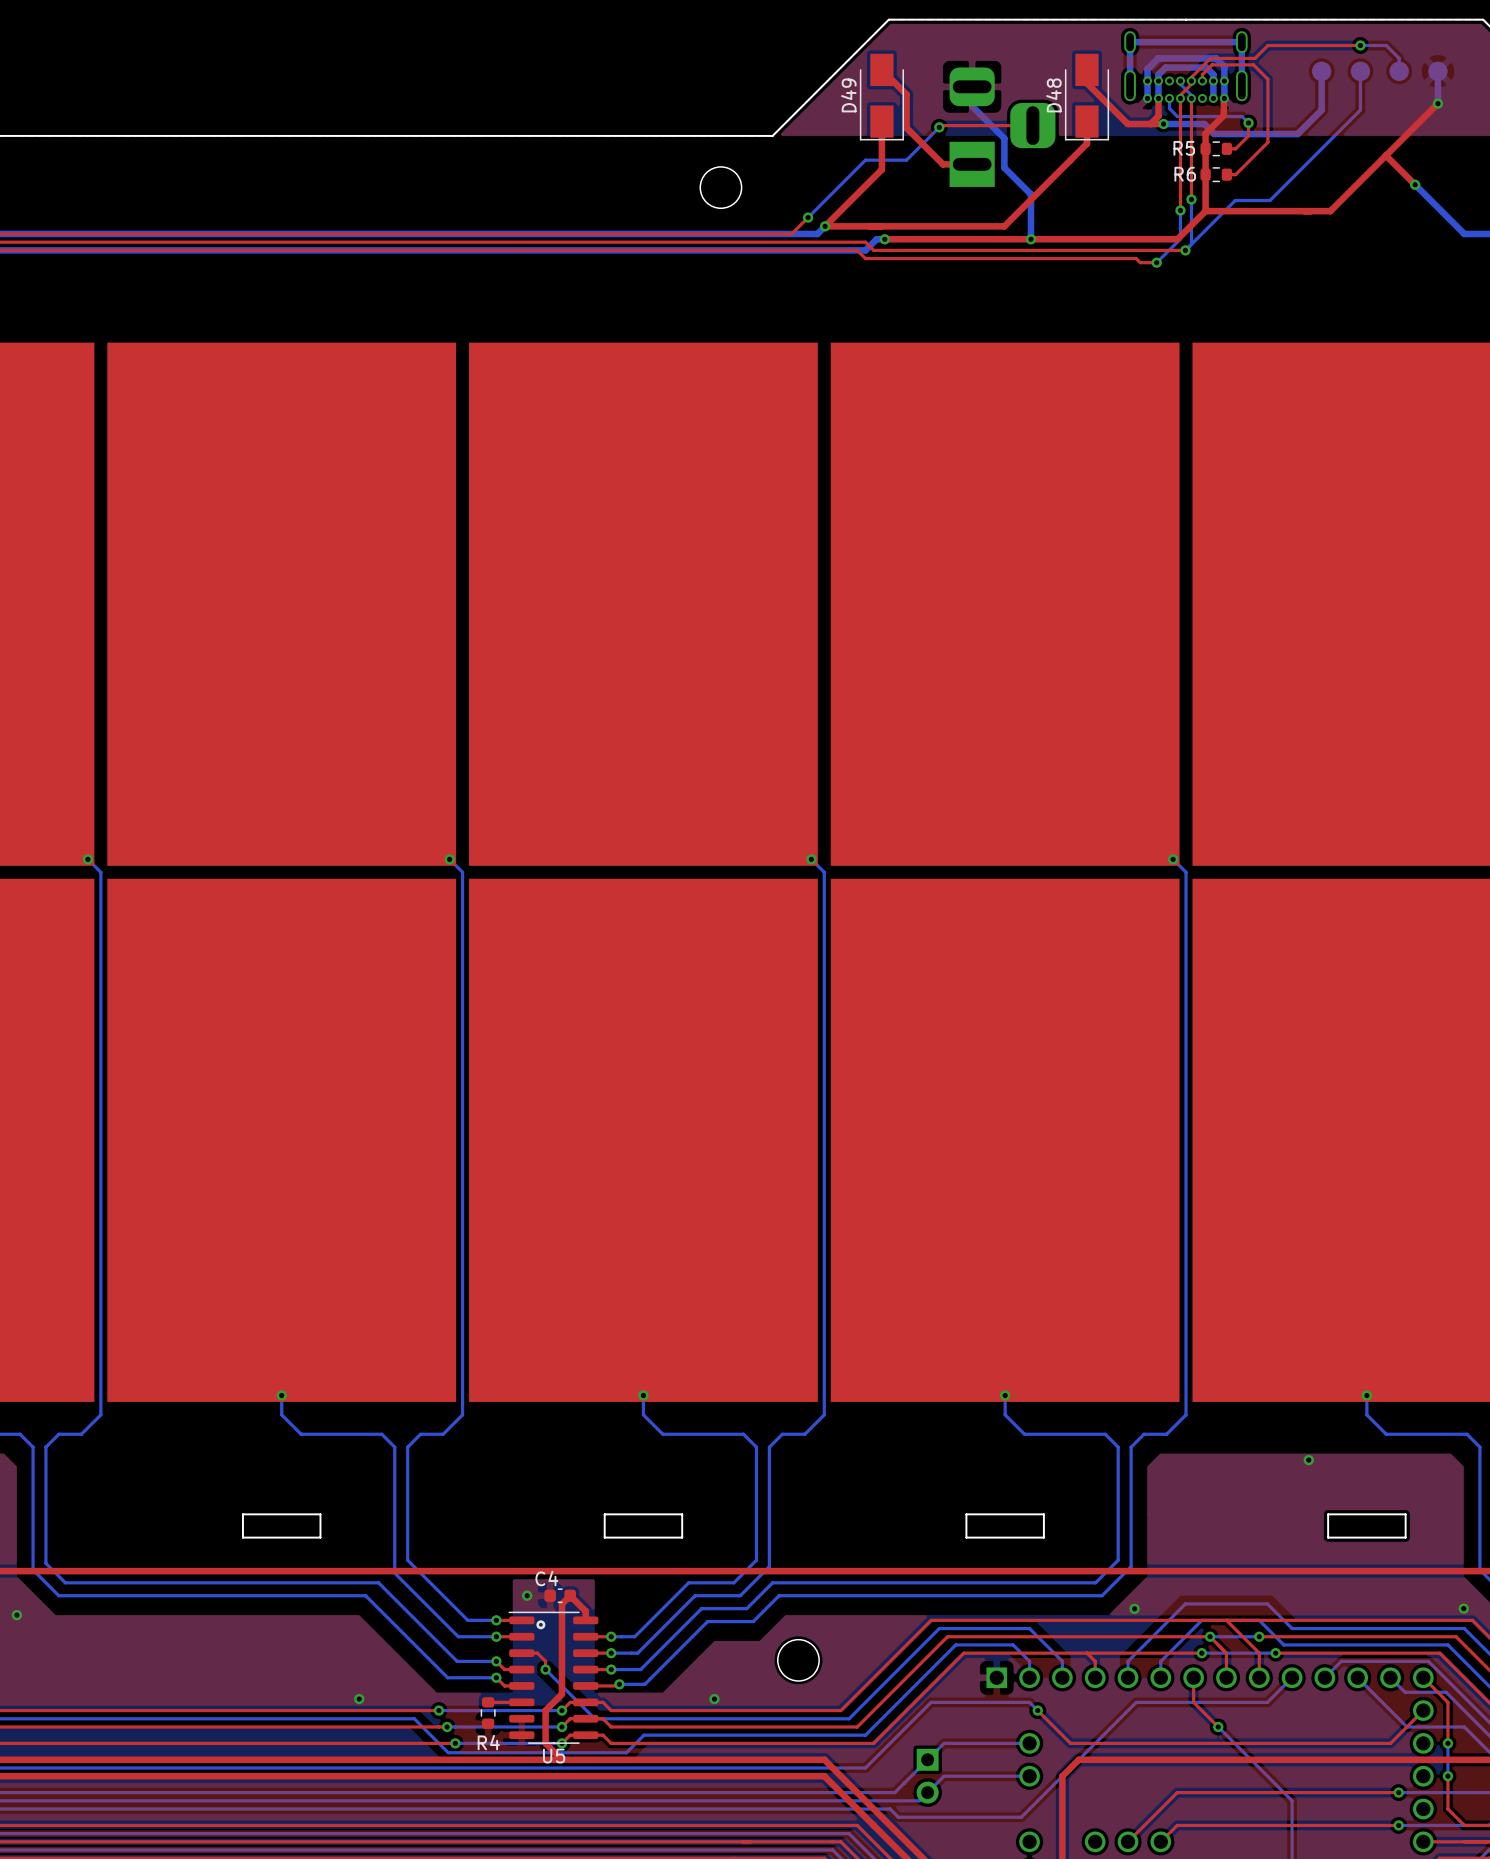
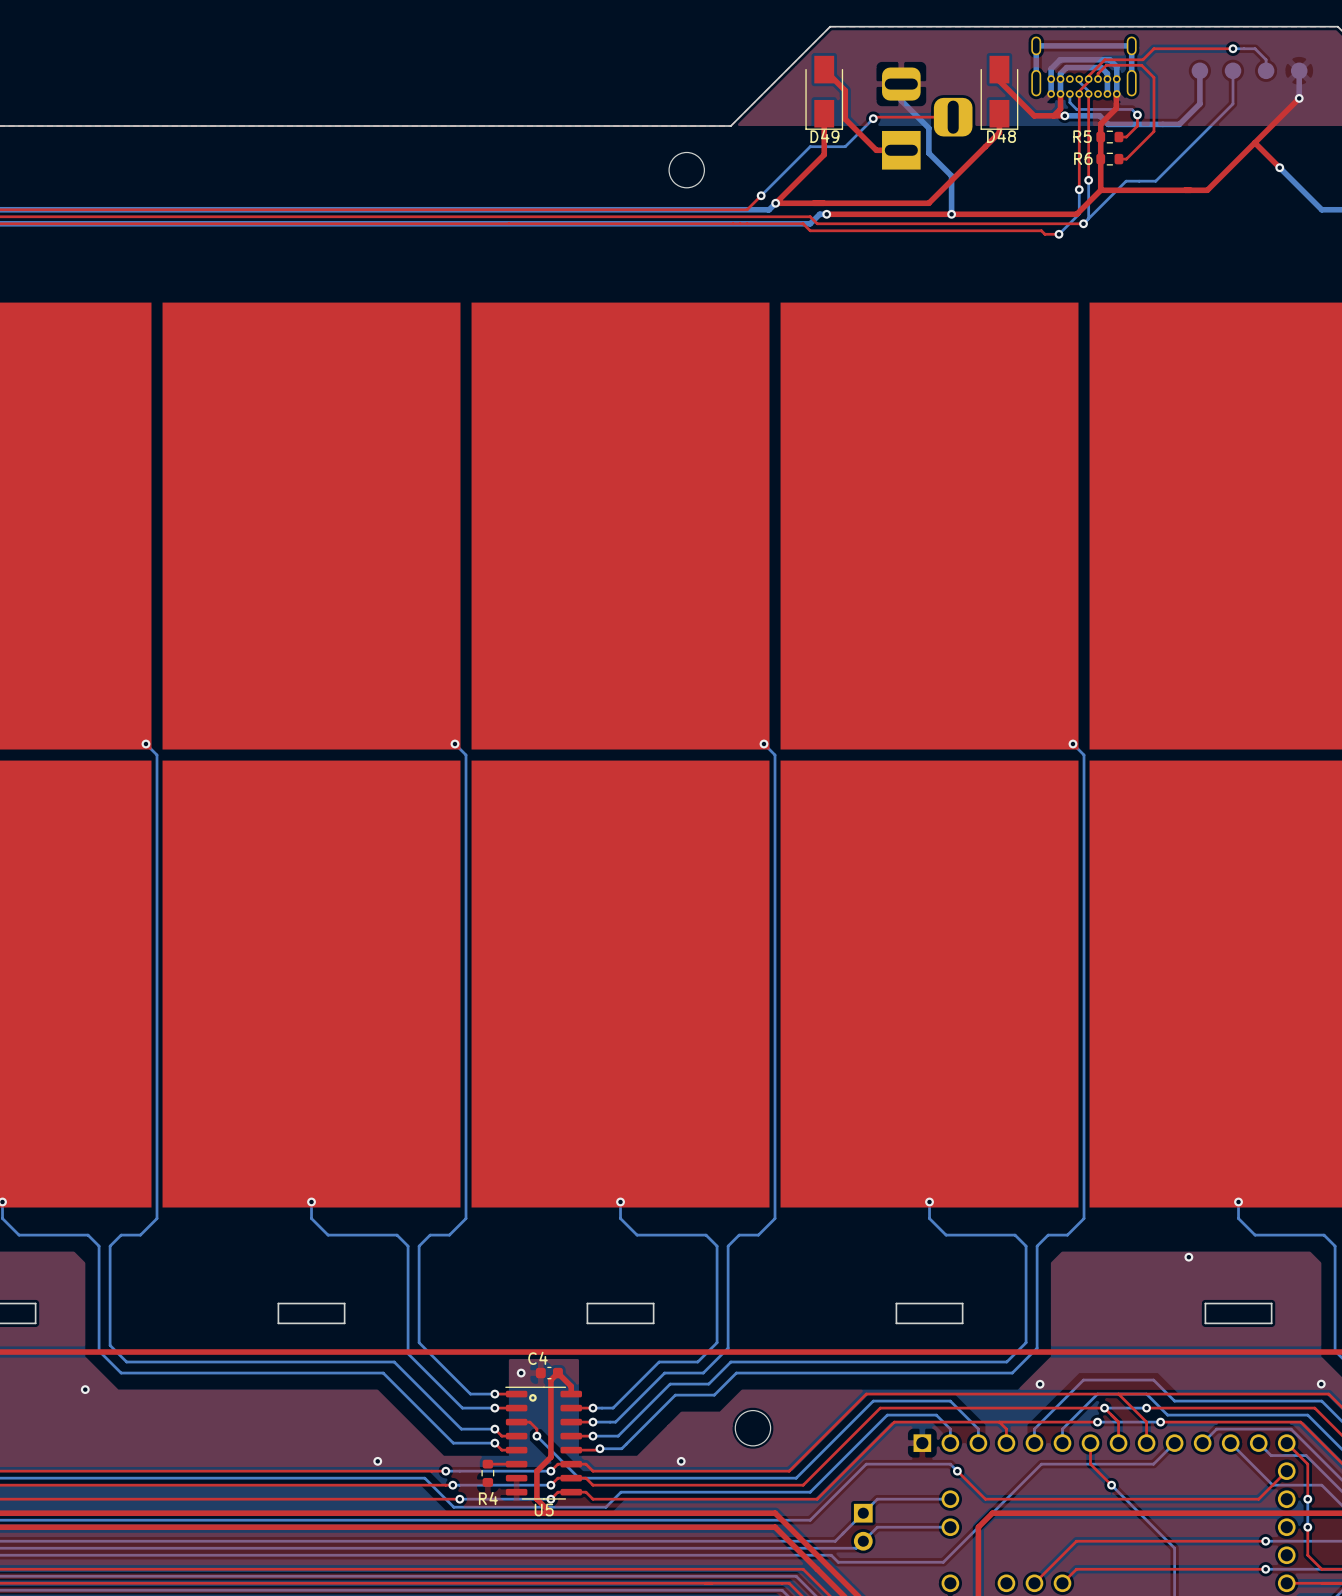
D49 name rotation: 0° (848, 95) -> 90° clockwise (824, 136)
D49 name position: D49 (848, 95) -> D49 (824, 136)
D48 name rotation: 0° (1053, 95) -> 90° clockwise (1001, 136)
D48 name position: D48 (1053, 95) -> D48 (1001, 136)

